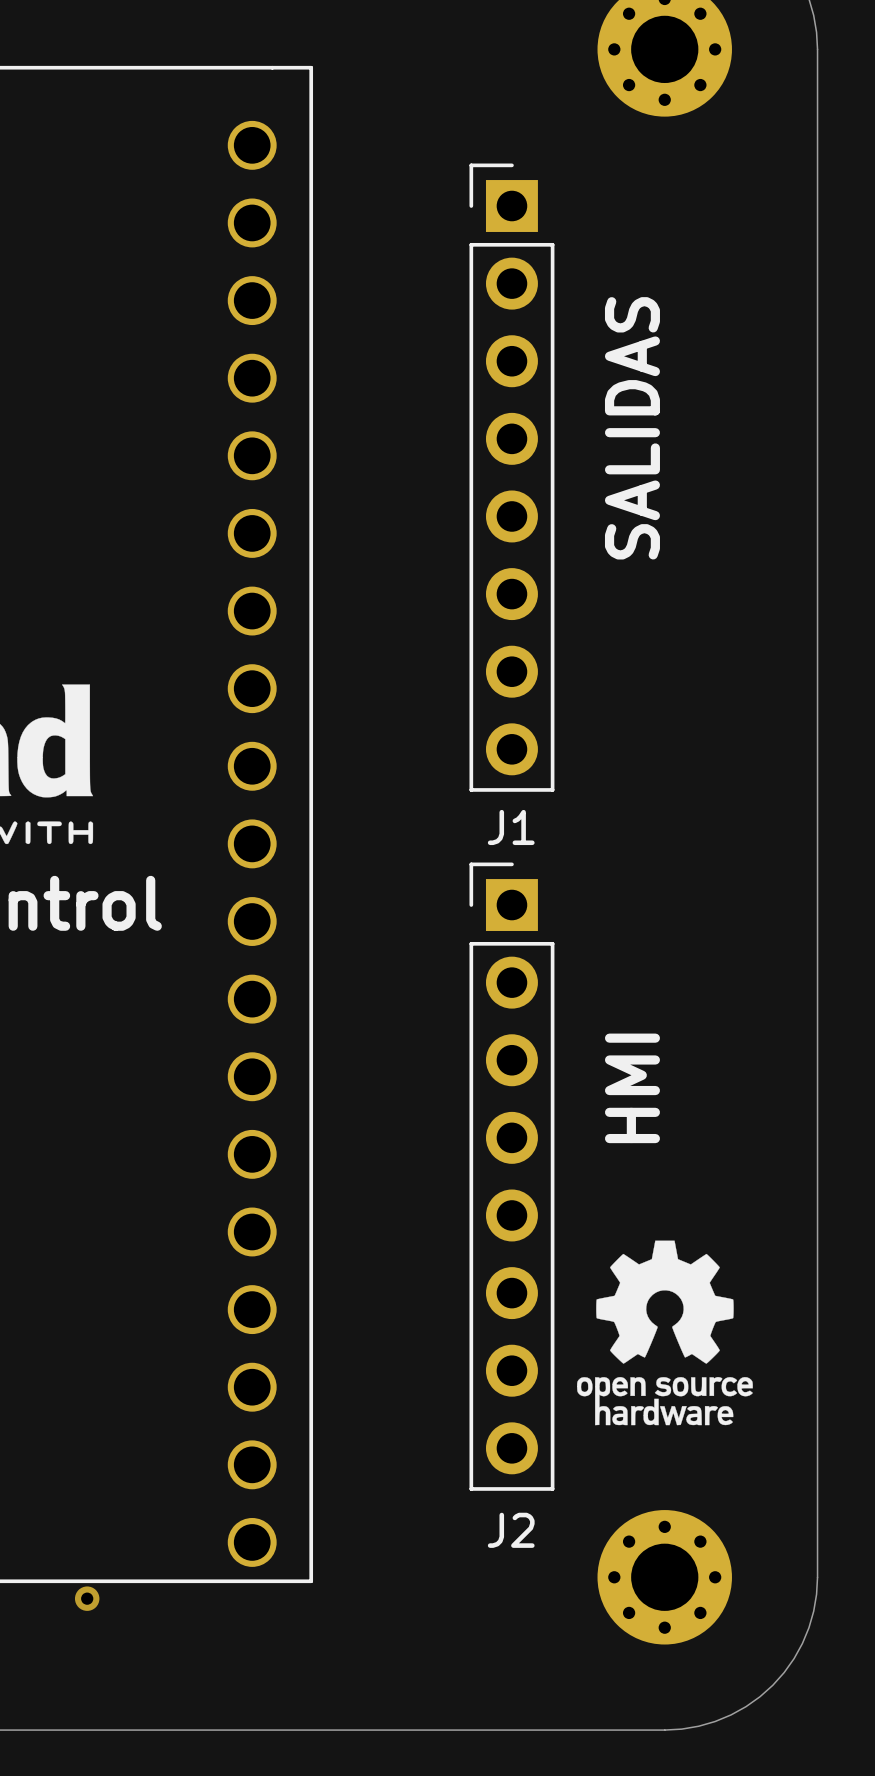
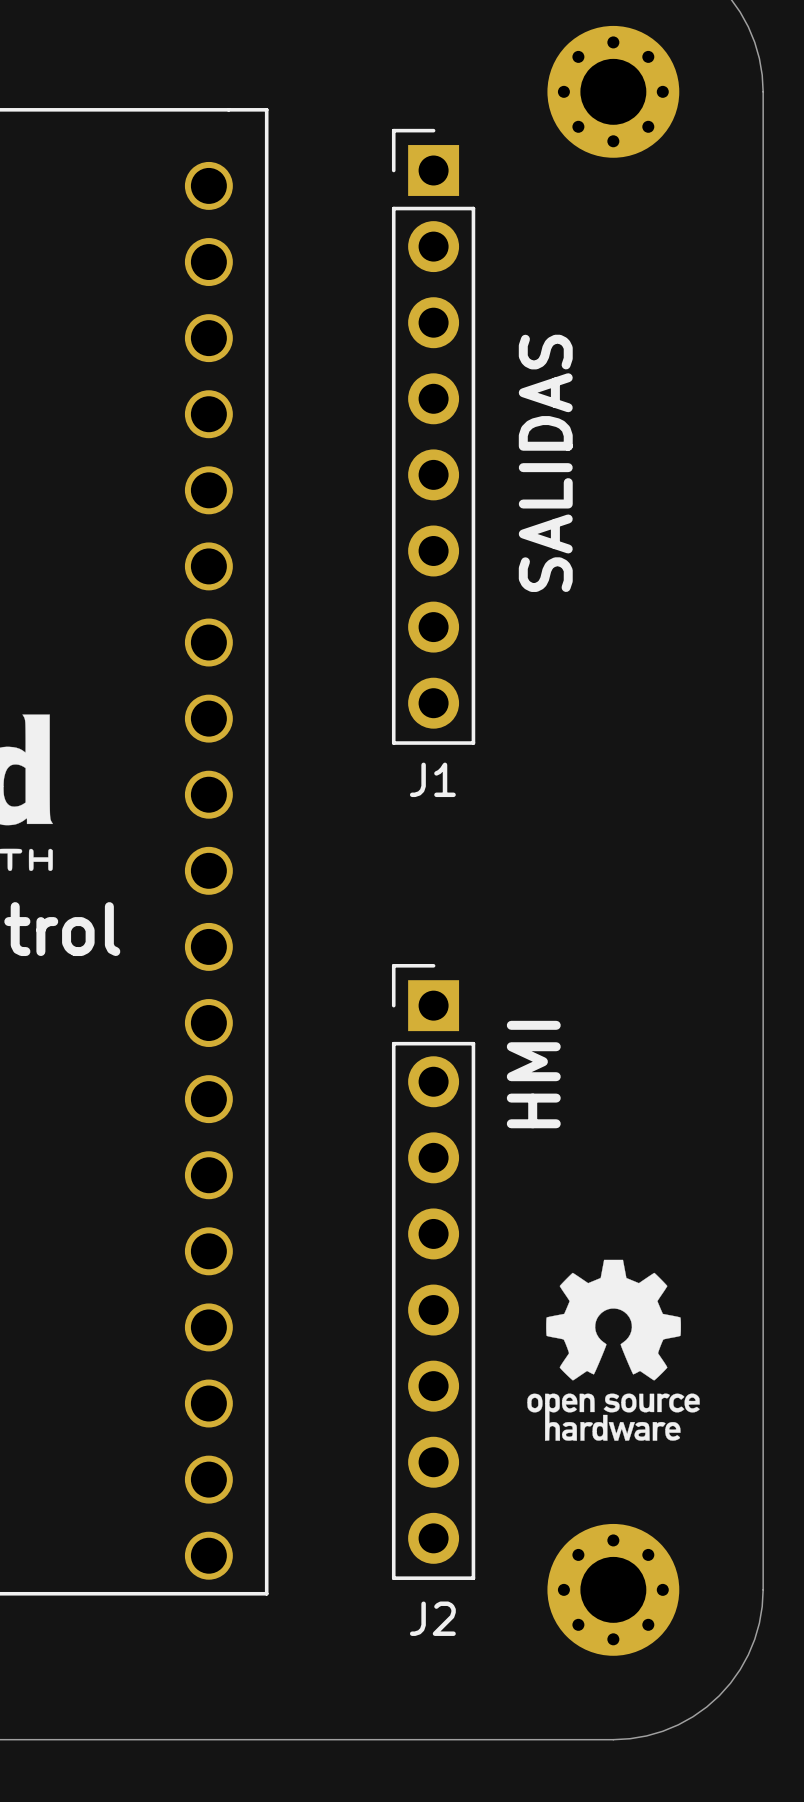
text position: SALIDAS (632, 428) -> SALIDAS (545, 463)
J1 position: (511, 477) -> (433, 436)
text position: HMI (632, 1088) -> HMI (533, 1074)
J2 position: (511, 1176) -> (433, 1271)
via: (87, 1598) -> none

